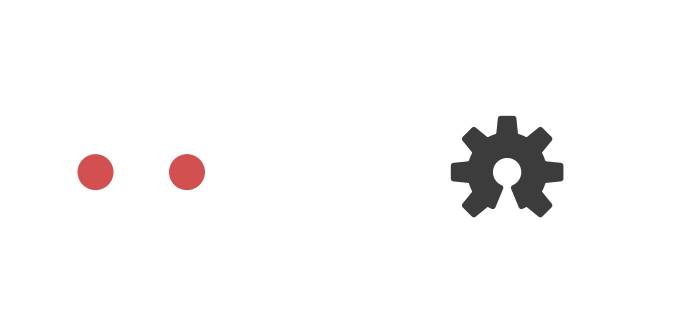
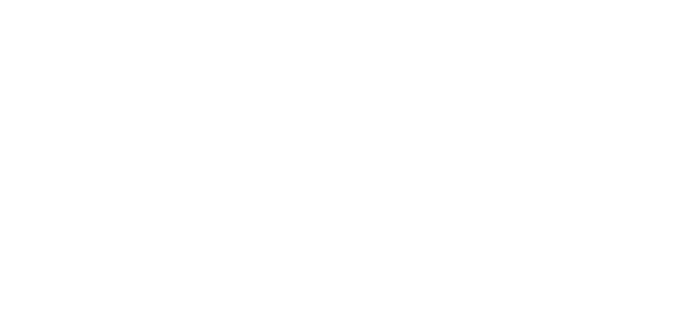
drawing: [450, 115, 564, 218] -> none
part: (95, 172) -> none
part: (186, 172) -> none

